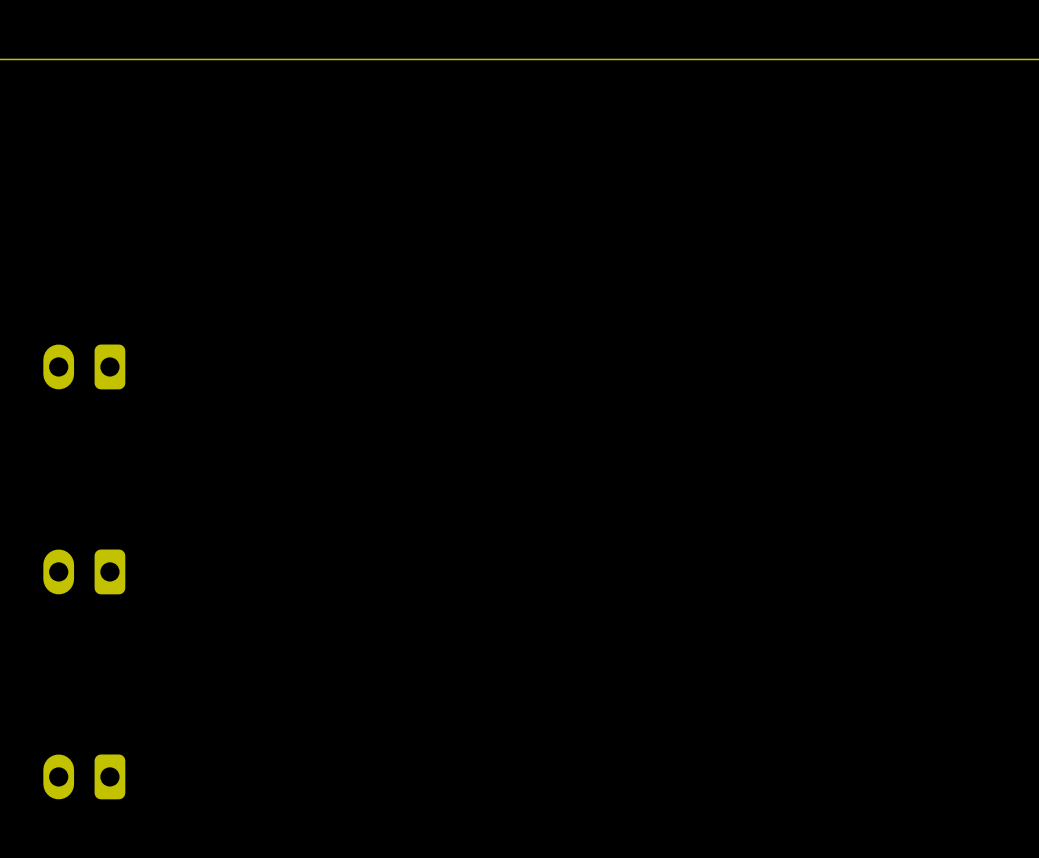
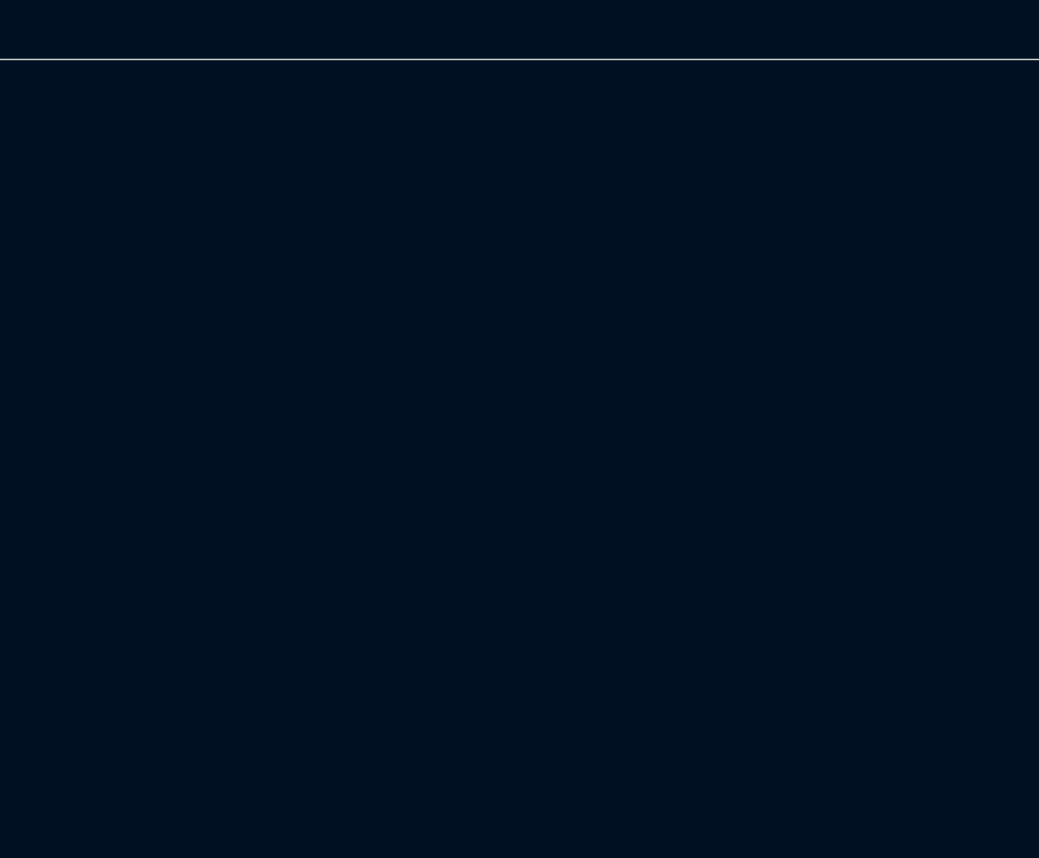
part: (84, 366) -> none
part: (84, 571) -> none
part: (84, 776) -> none

